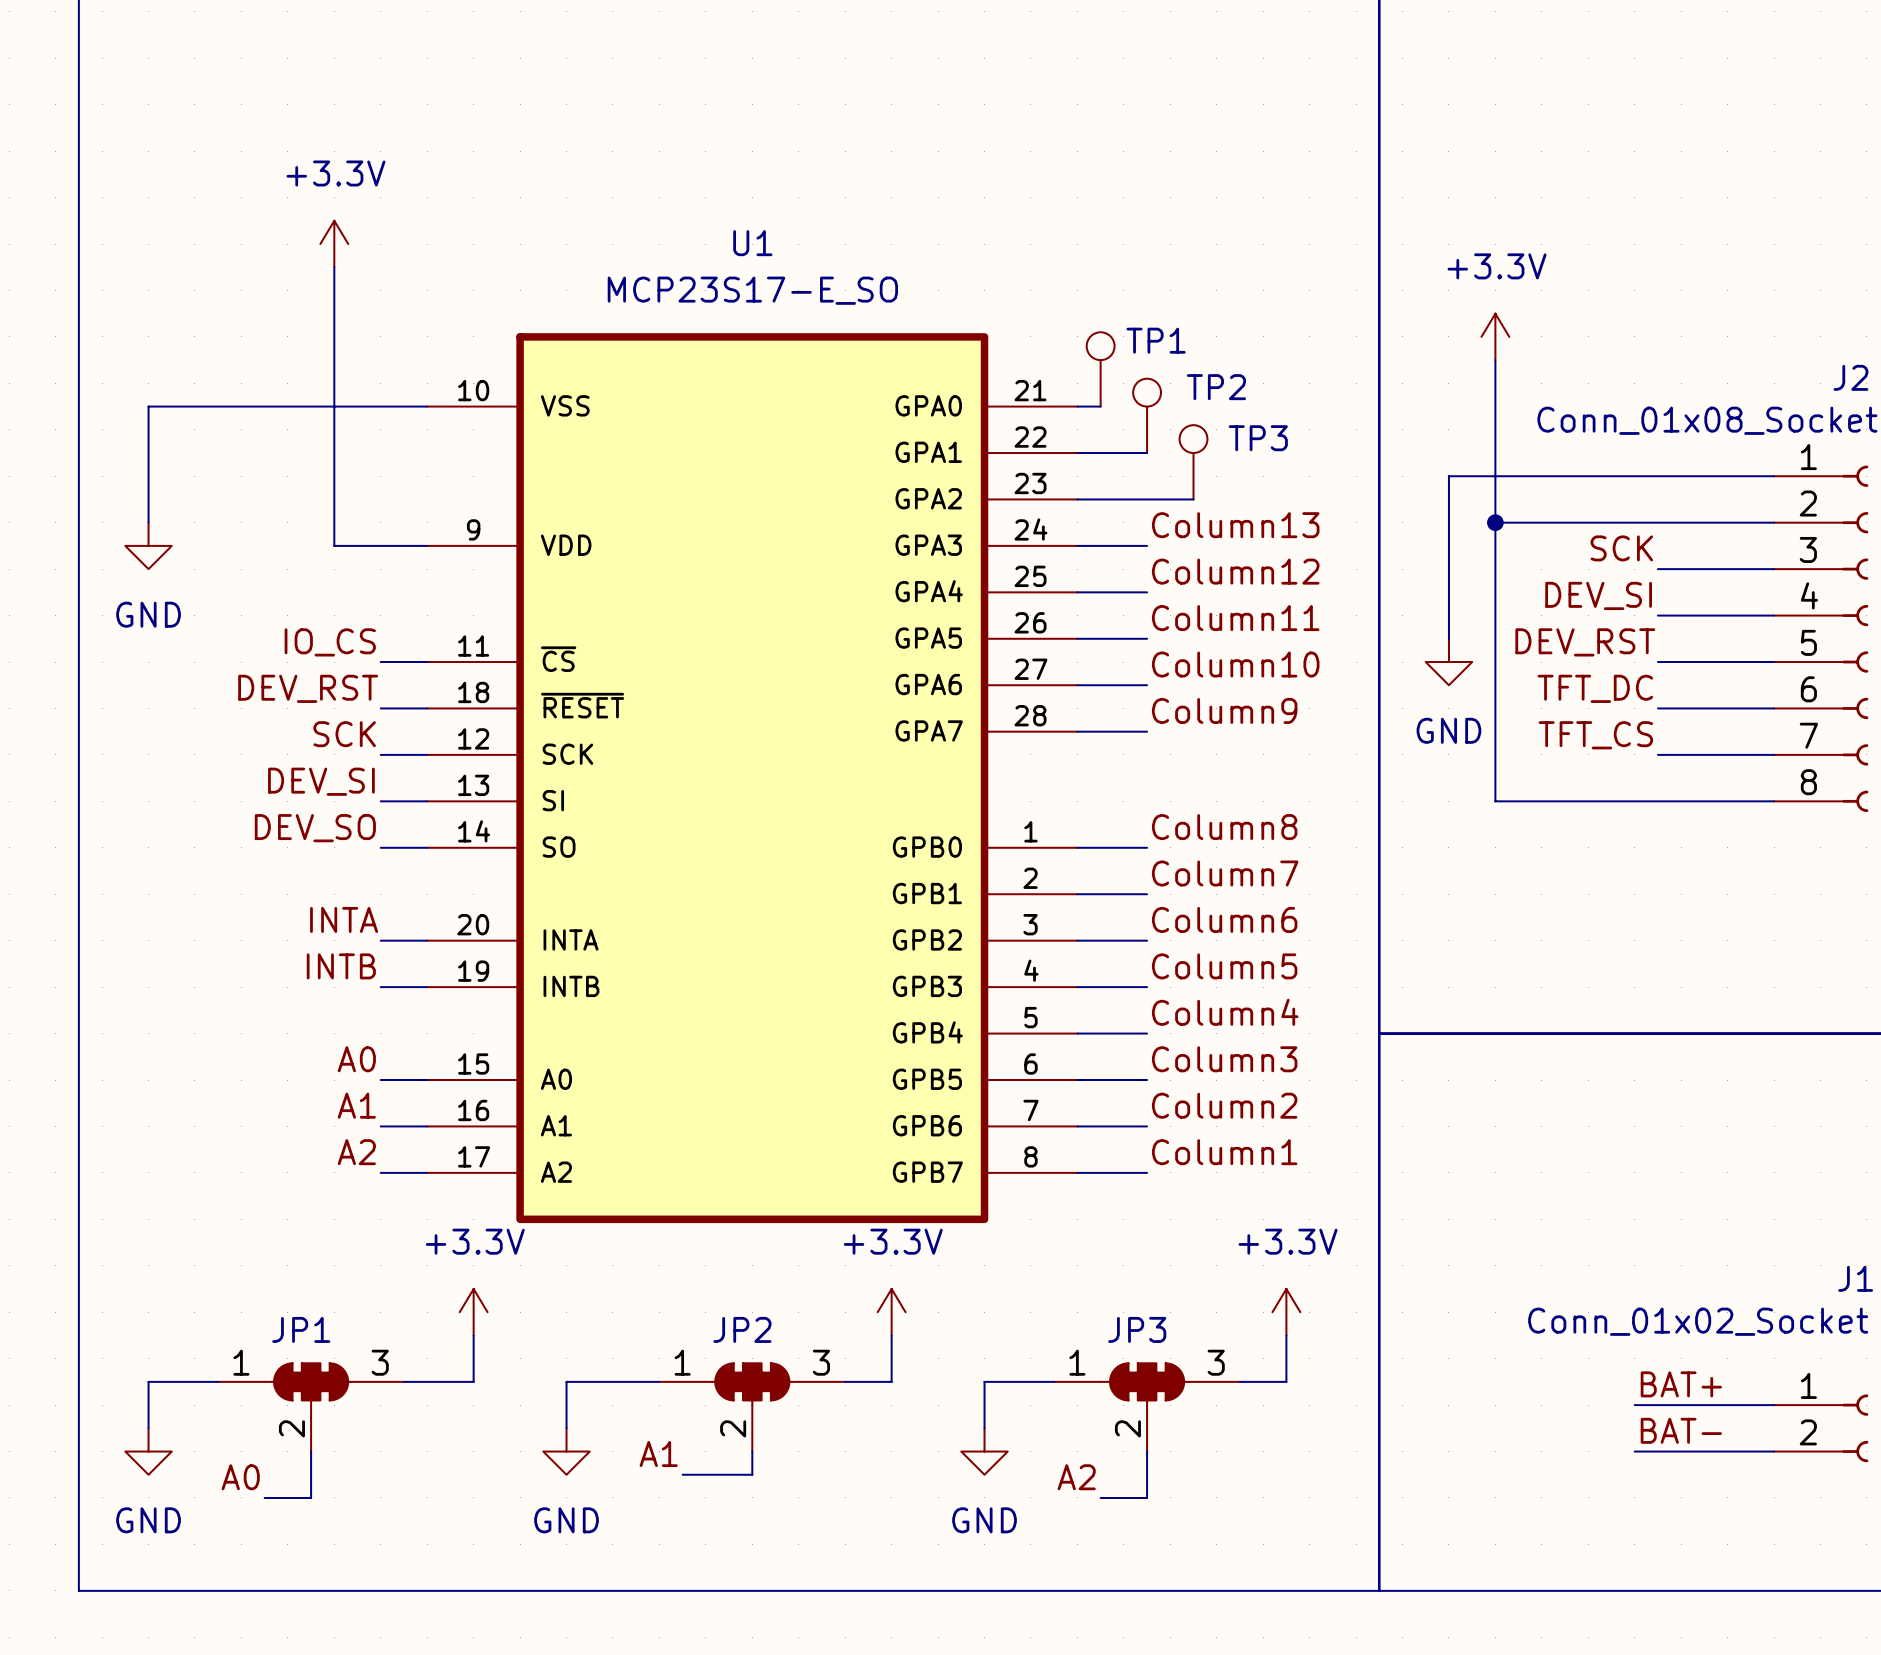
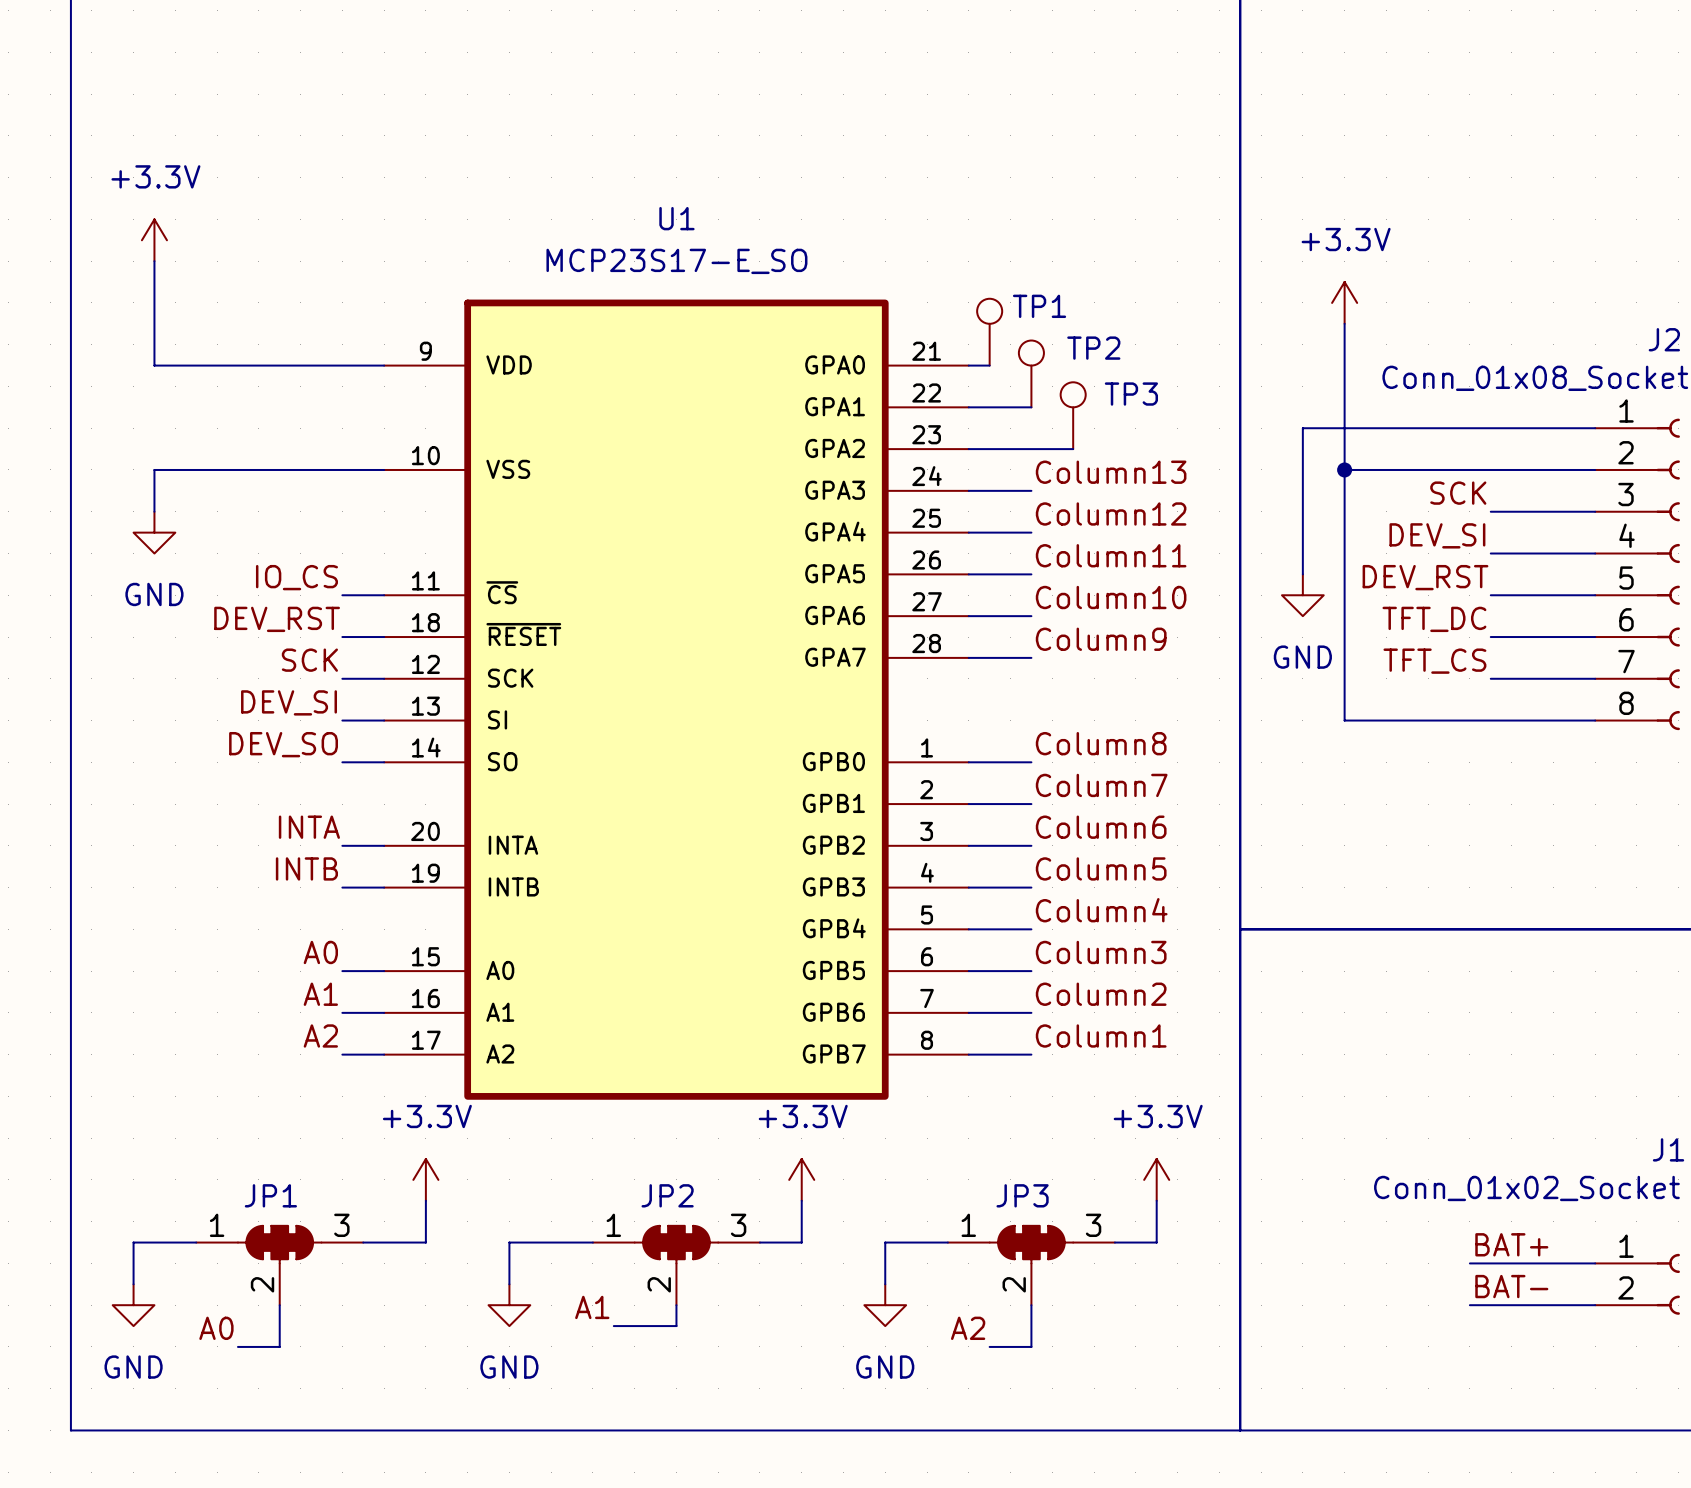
power symbol position: +3.3V (334, 244) -> +3.3V (154, 240)
wire: (334, 267) (334, 545) (427, 545) -> none
U1 symbol: [427, 333, 1078, 1224] -> [384, 299, 969, 1100]
wire: (171, 406) (148, 406) (148, 522) -> (154, 365) (154, 261)
wire: none -> (384, 469) (154, 469) (154, 511)
power symbol position: GND (148, 545) -> GND (154, 532)

